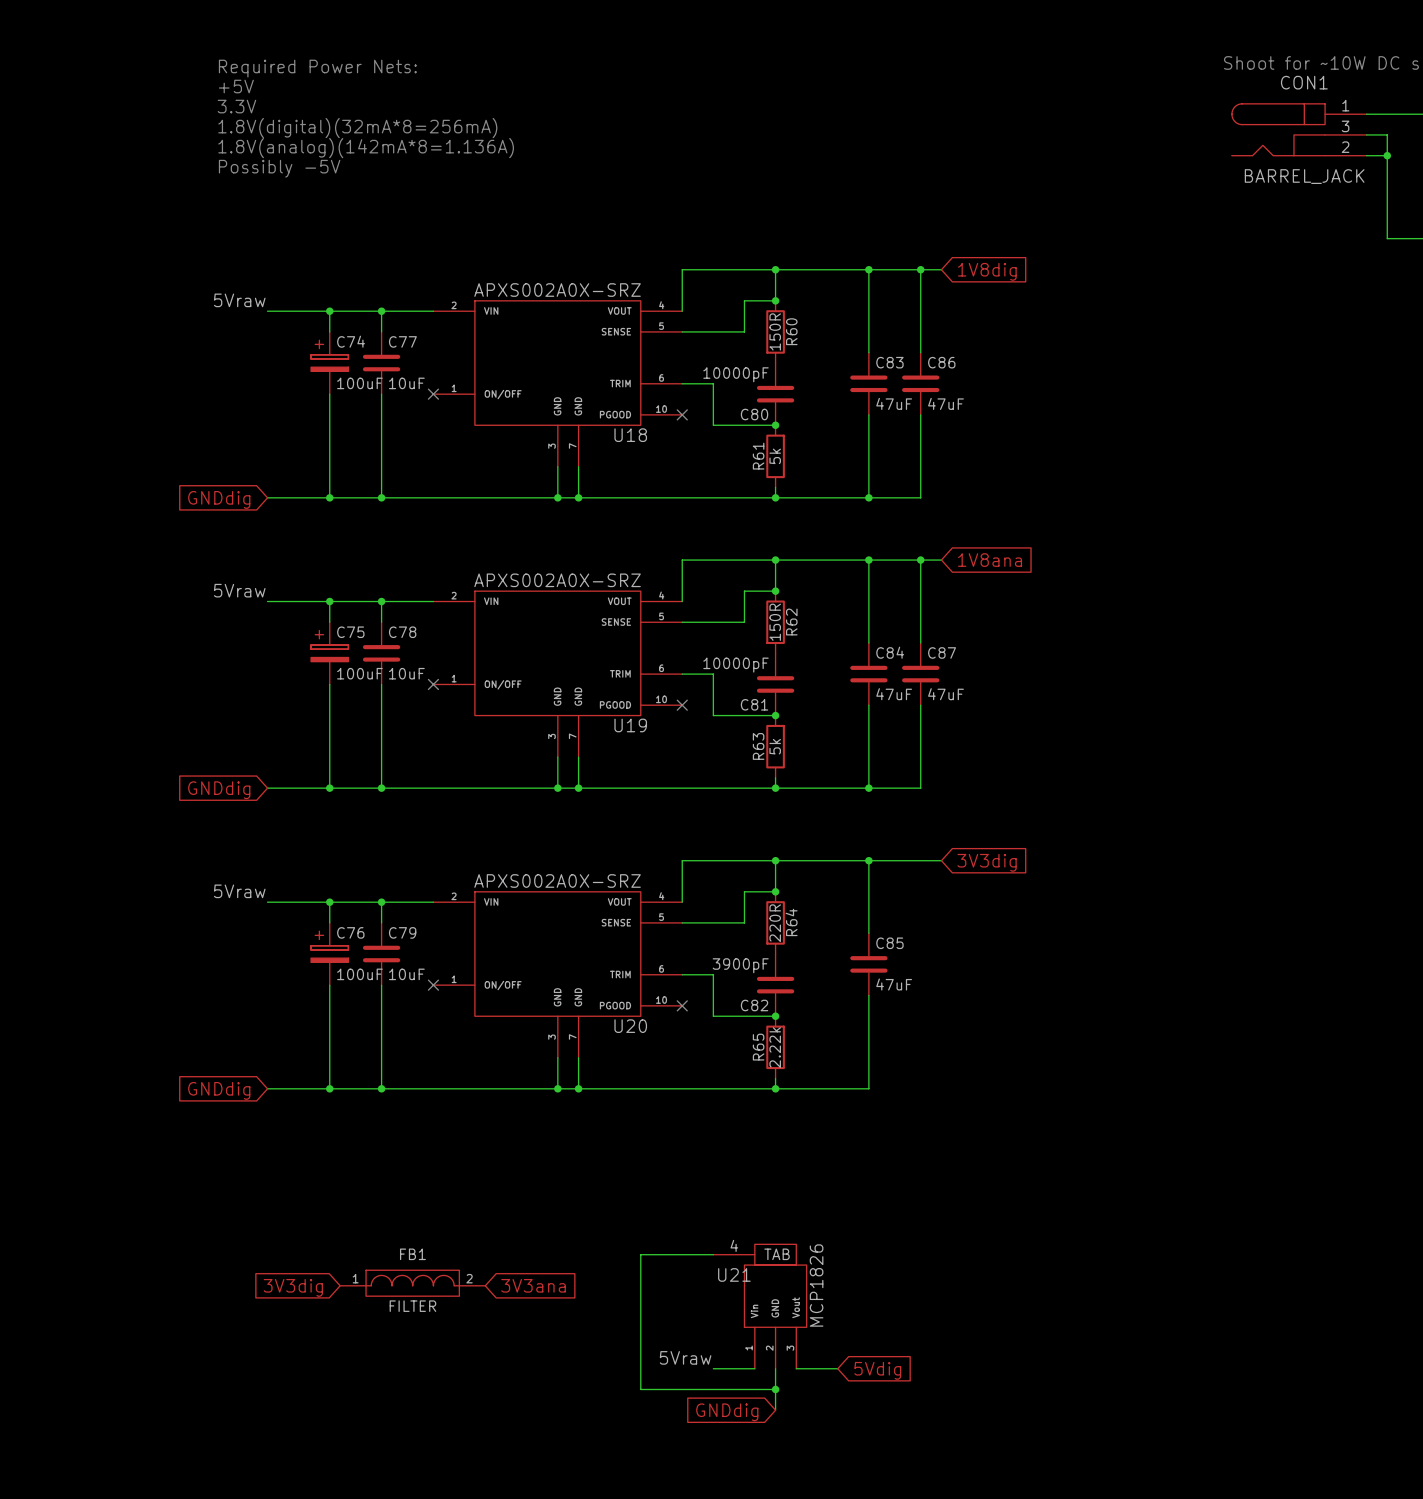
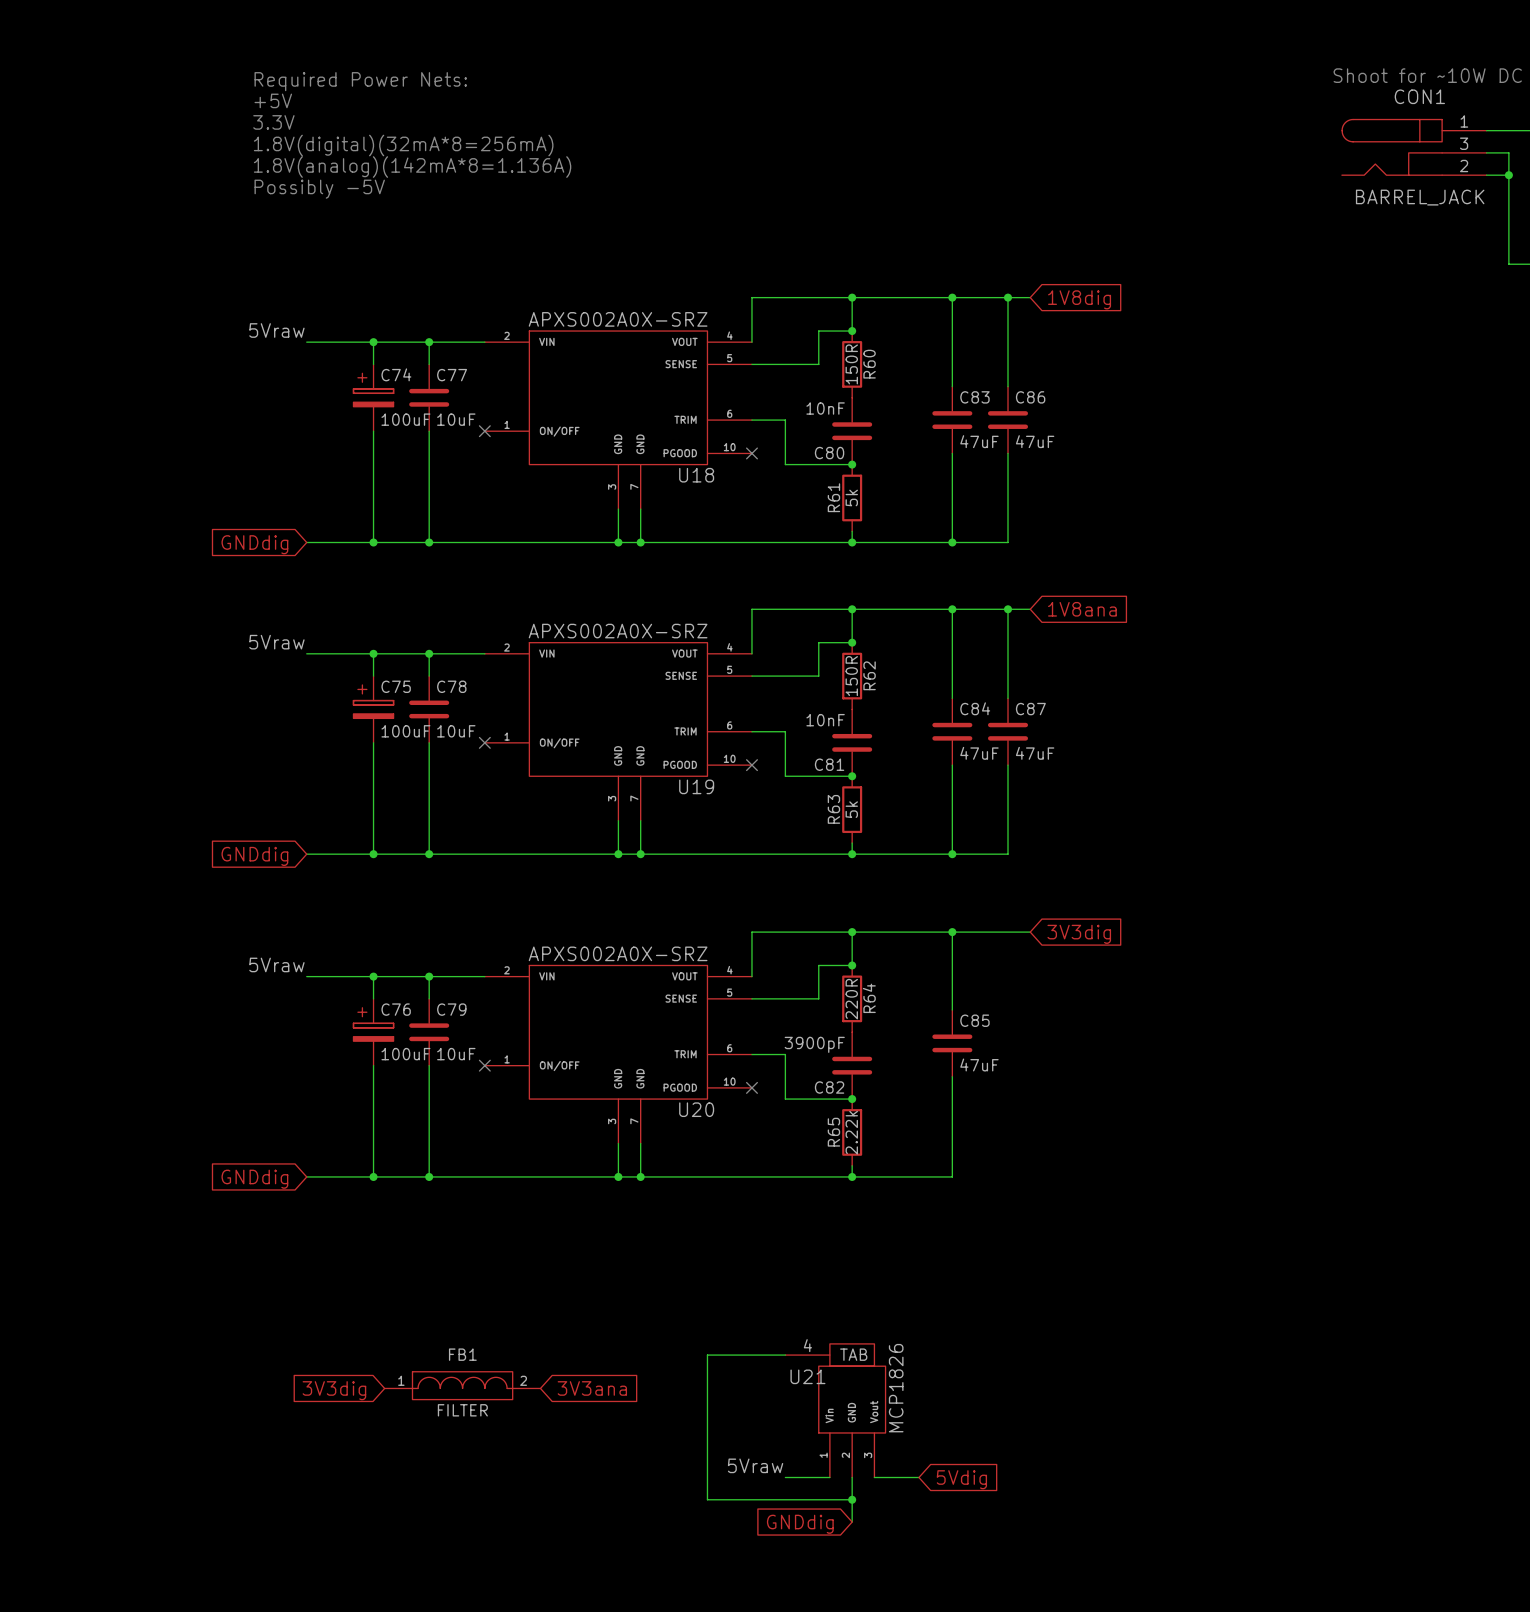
C80 value: 10000pF (736, 374) -> 10nF (825, 408)
C81 value: 10000pF (736, 665) -> 10nF (825, 720)

